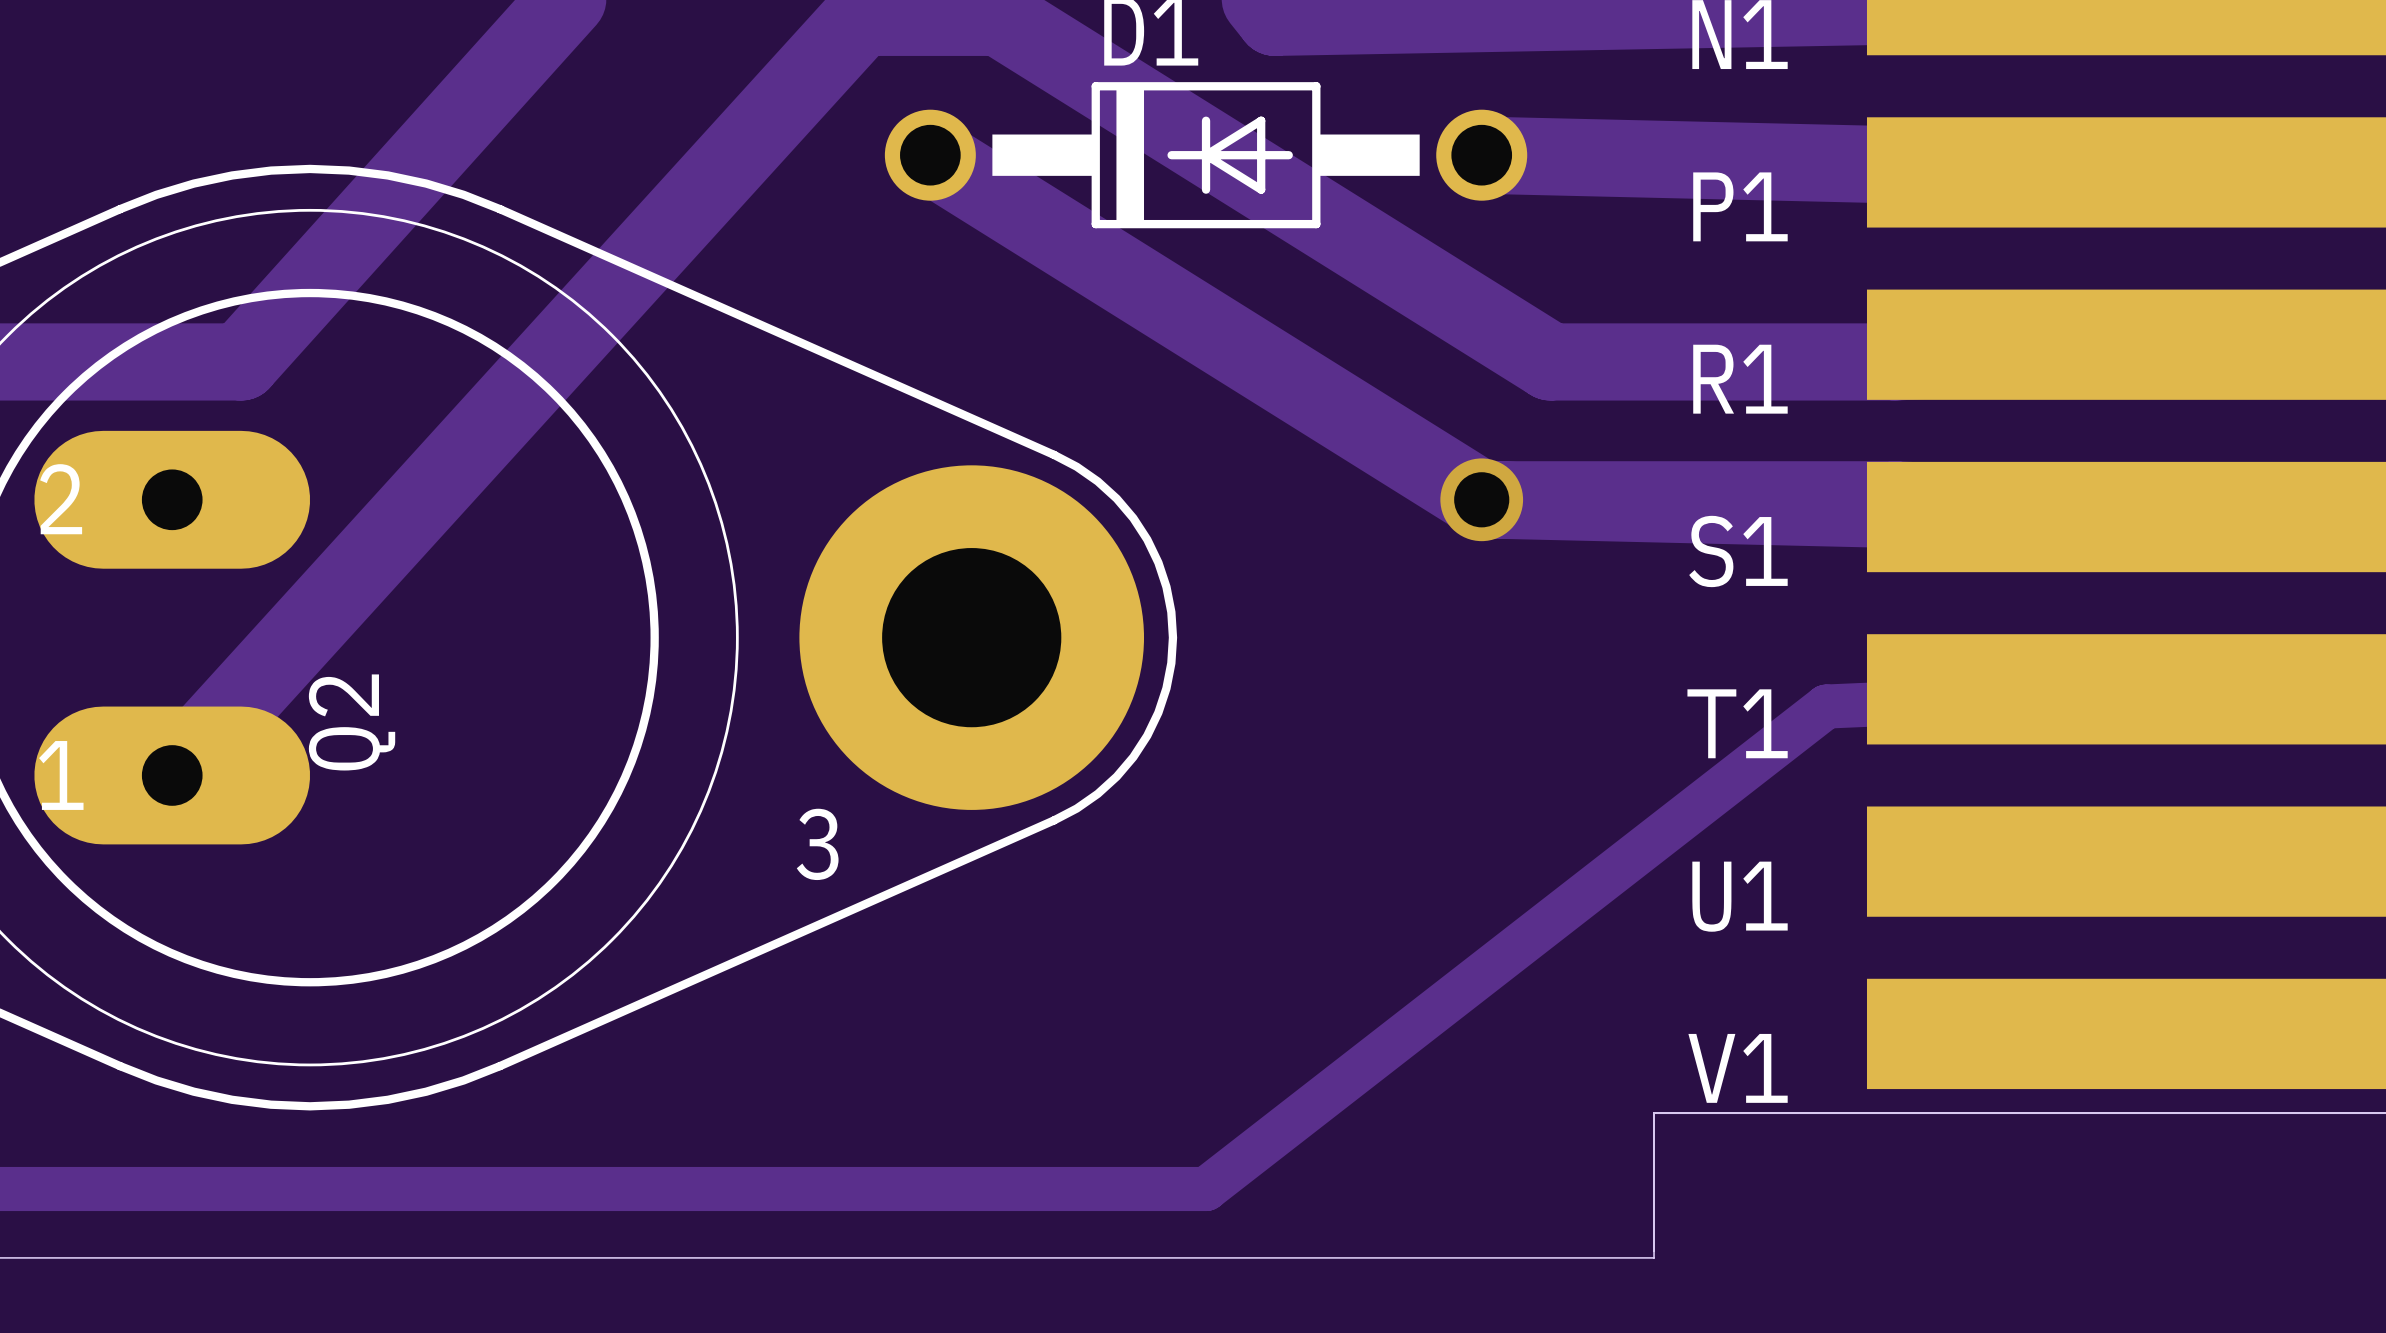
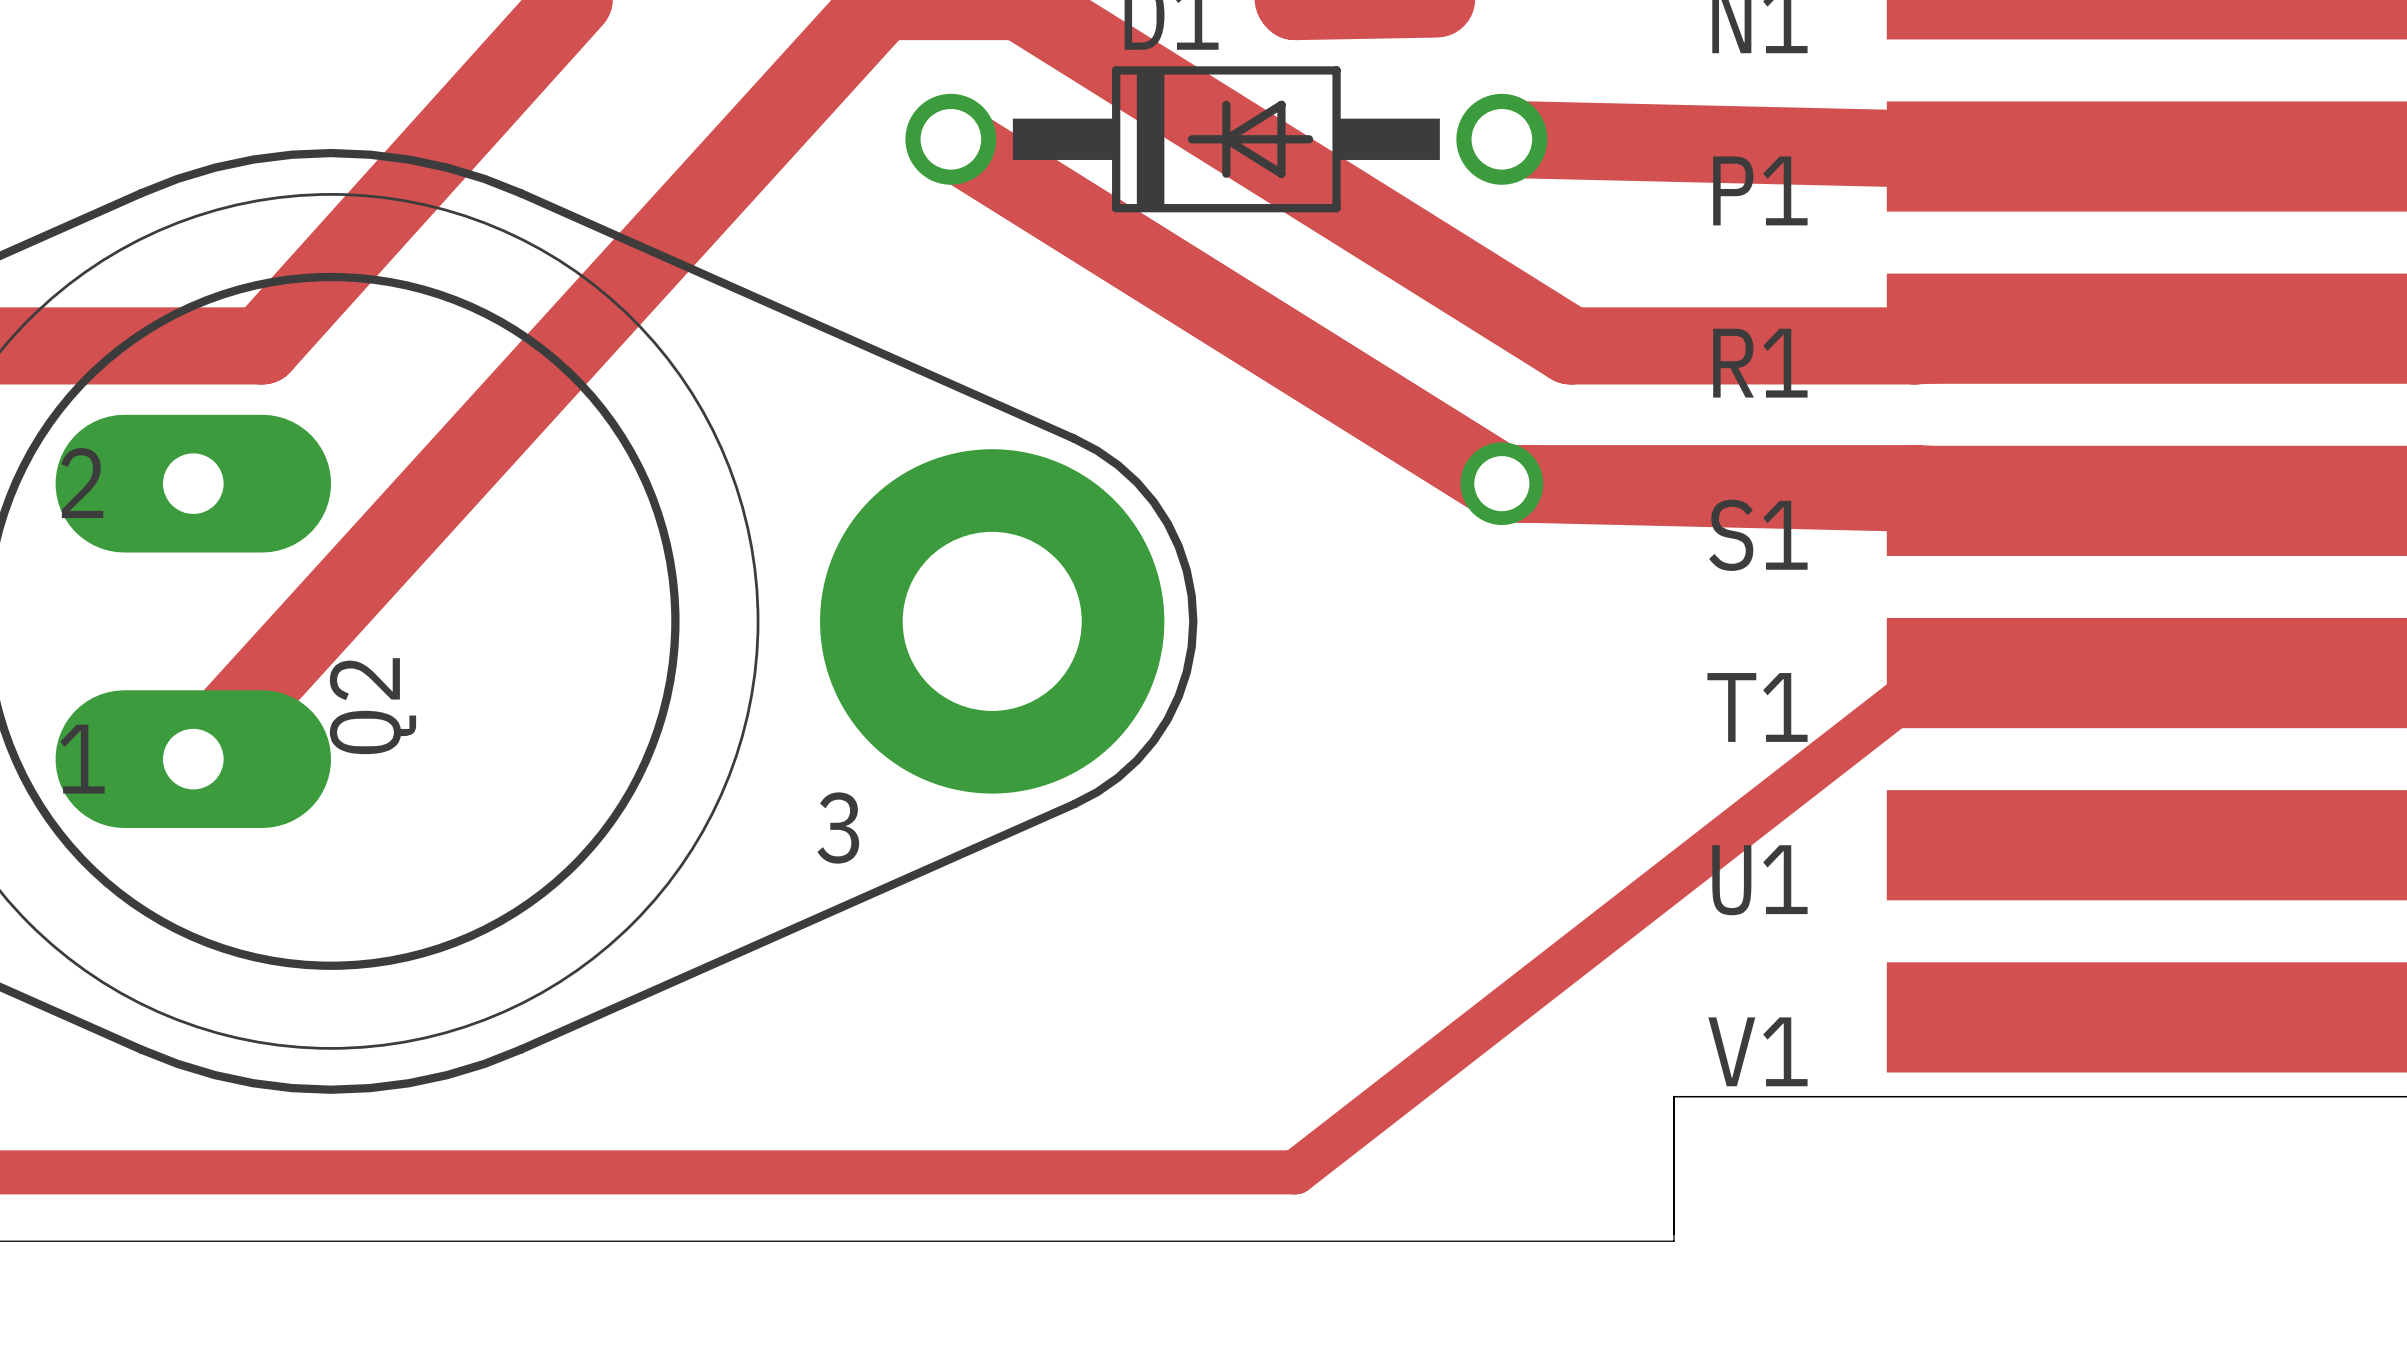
track: (2222, 689) (1826, 706) (1206, 1189) -> (2242, 673) (1915, 690) (1295, 1172) (1226, 1172)

